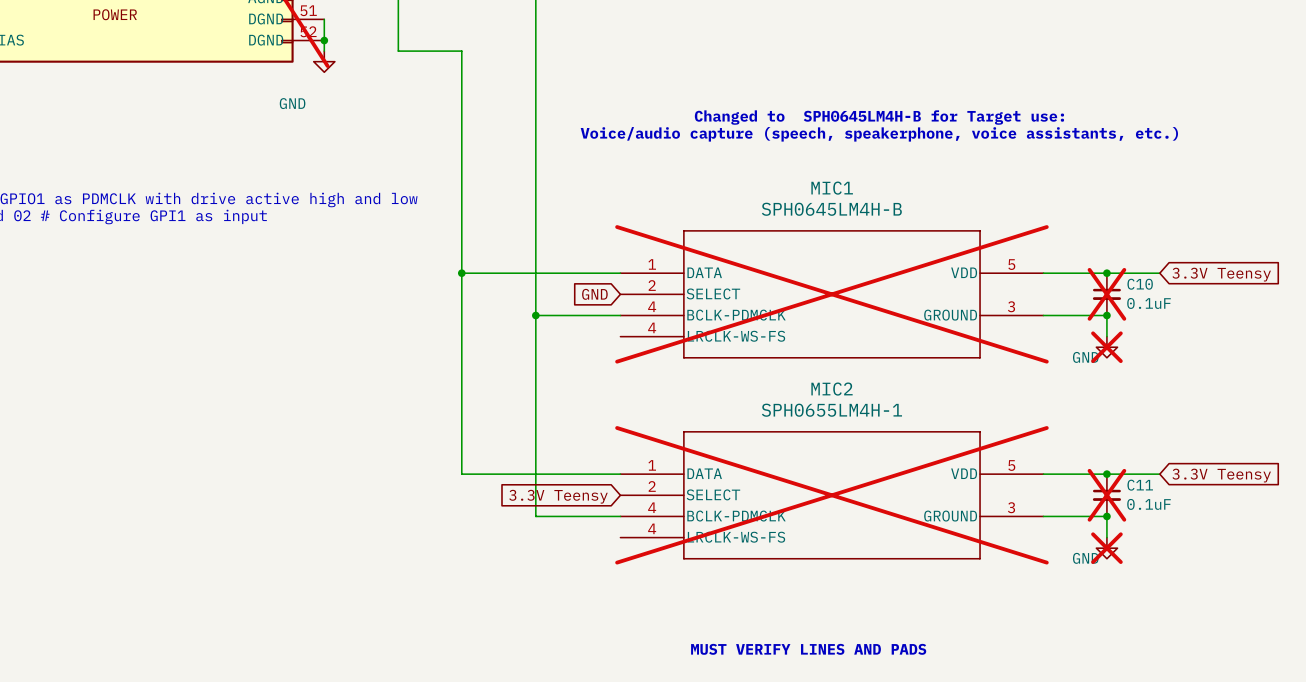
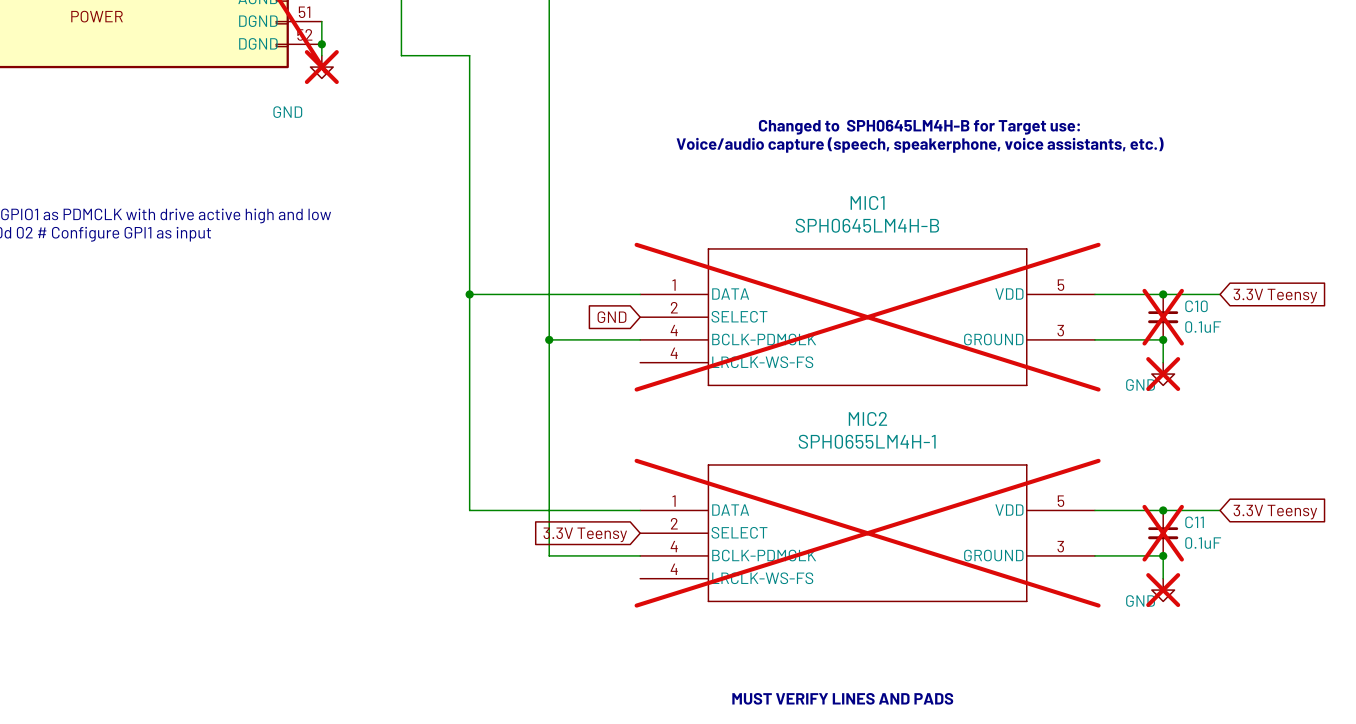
power symbol do-not-place cross: none -> (321, 67)

